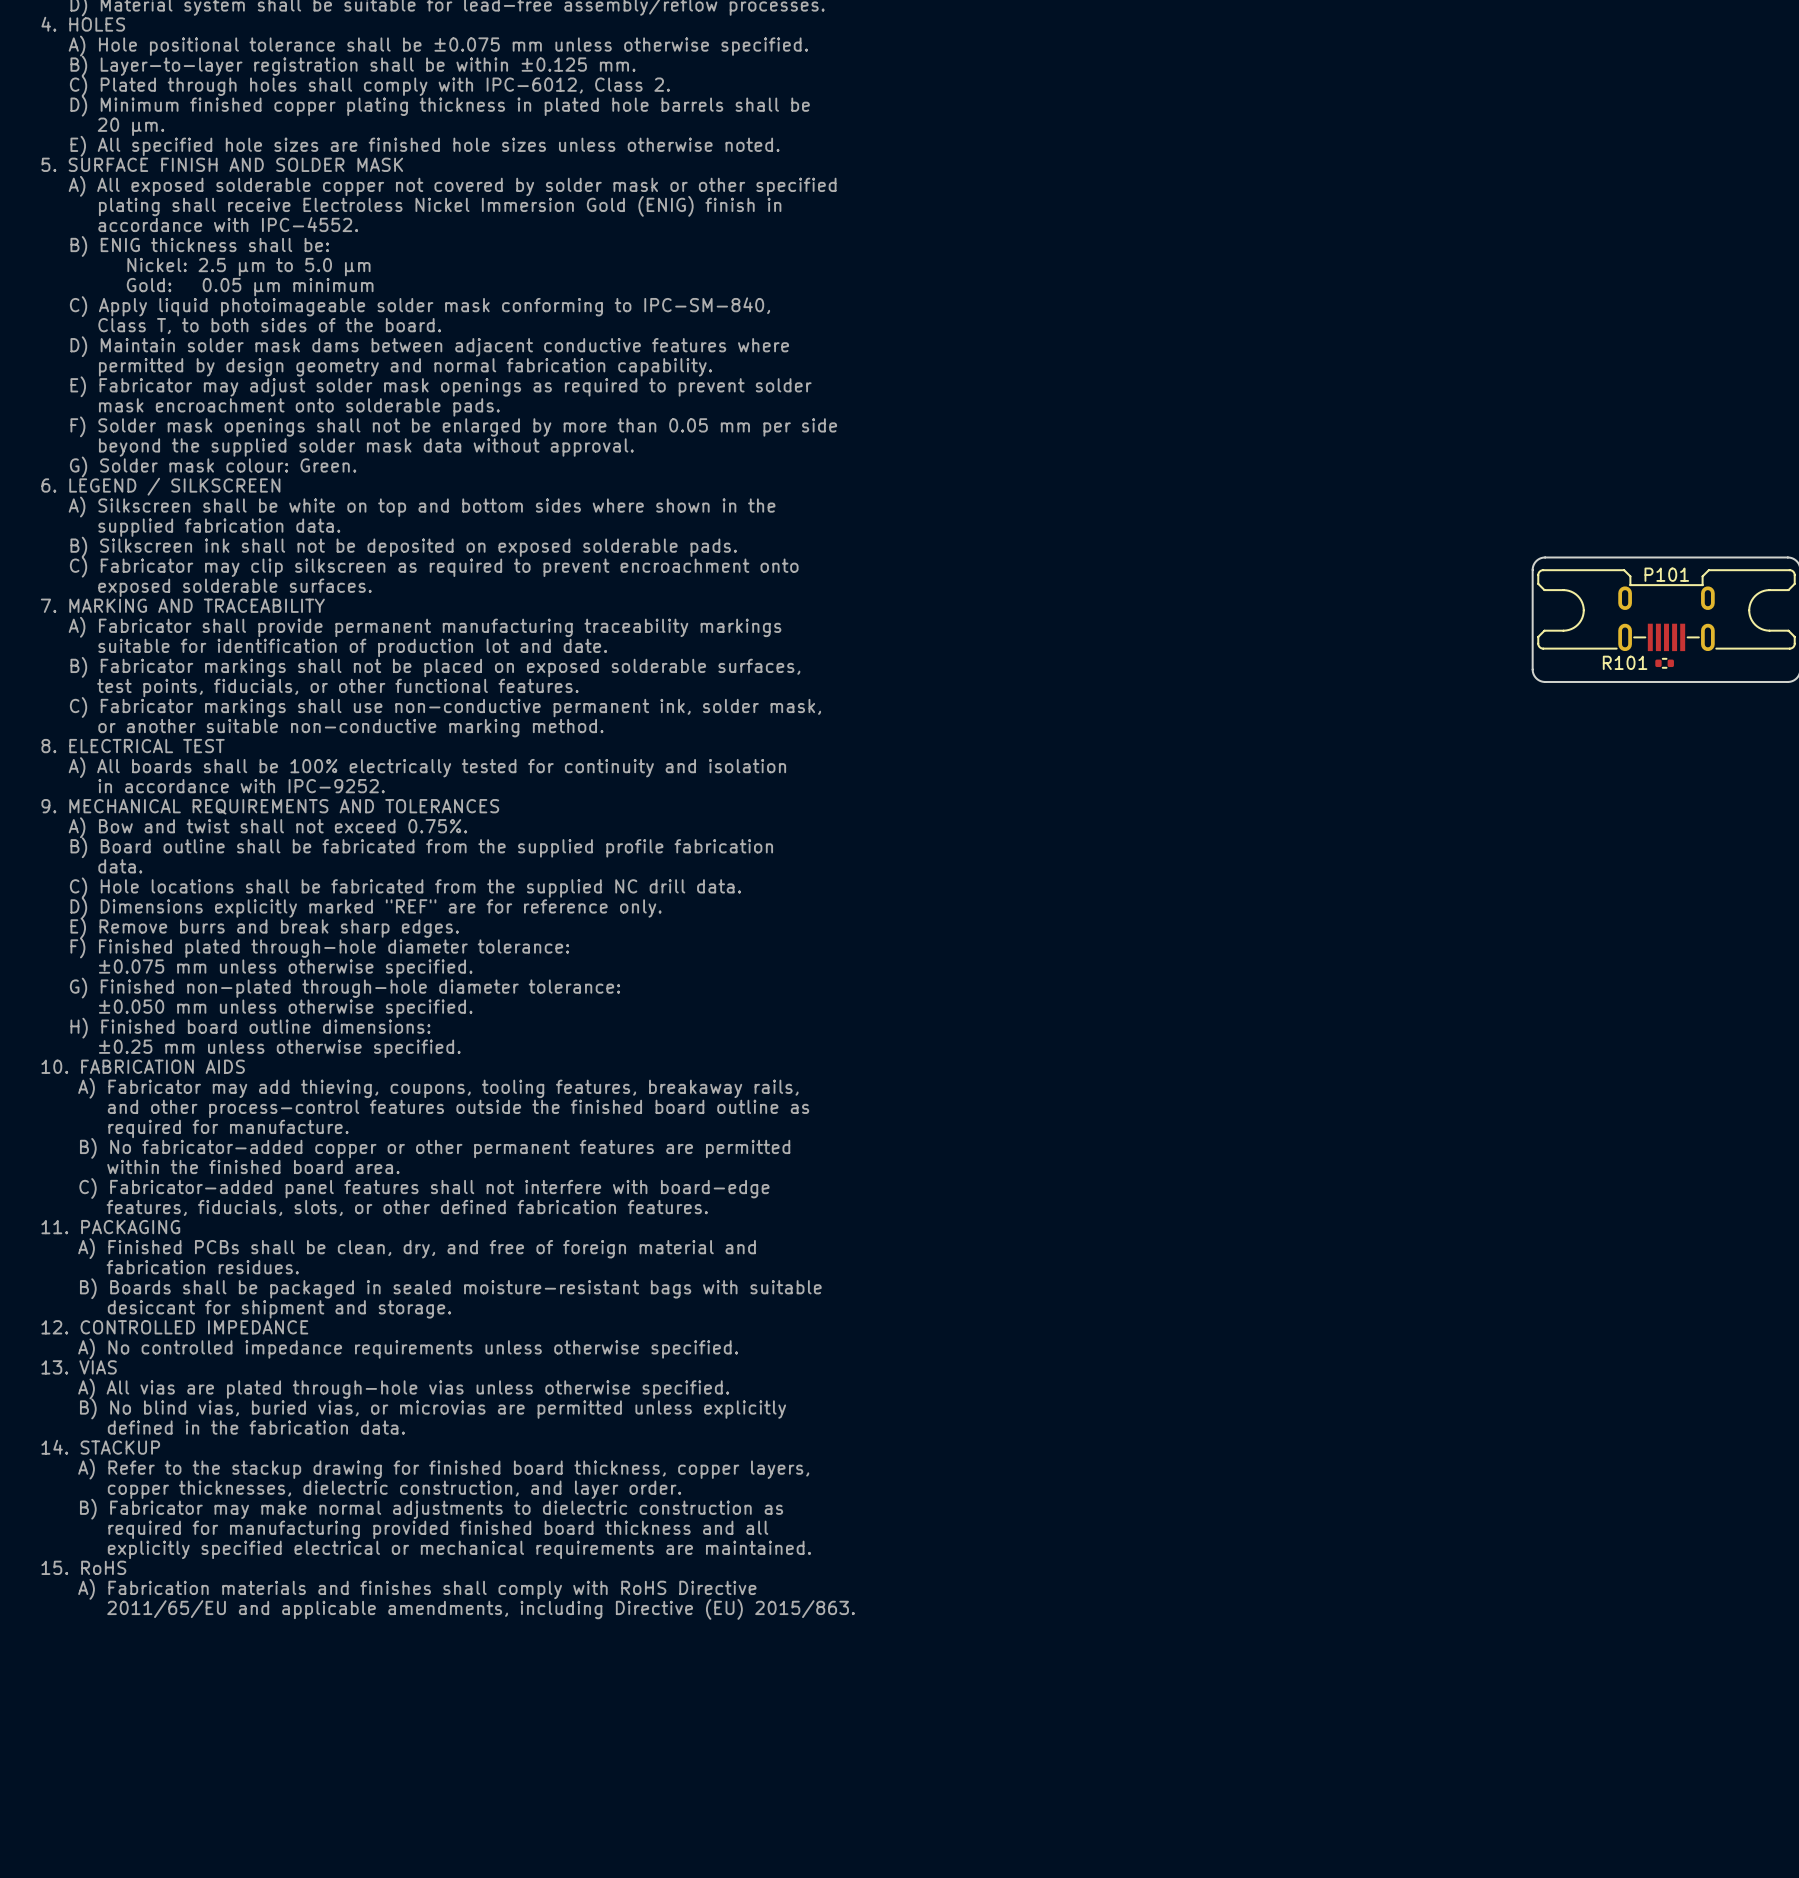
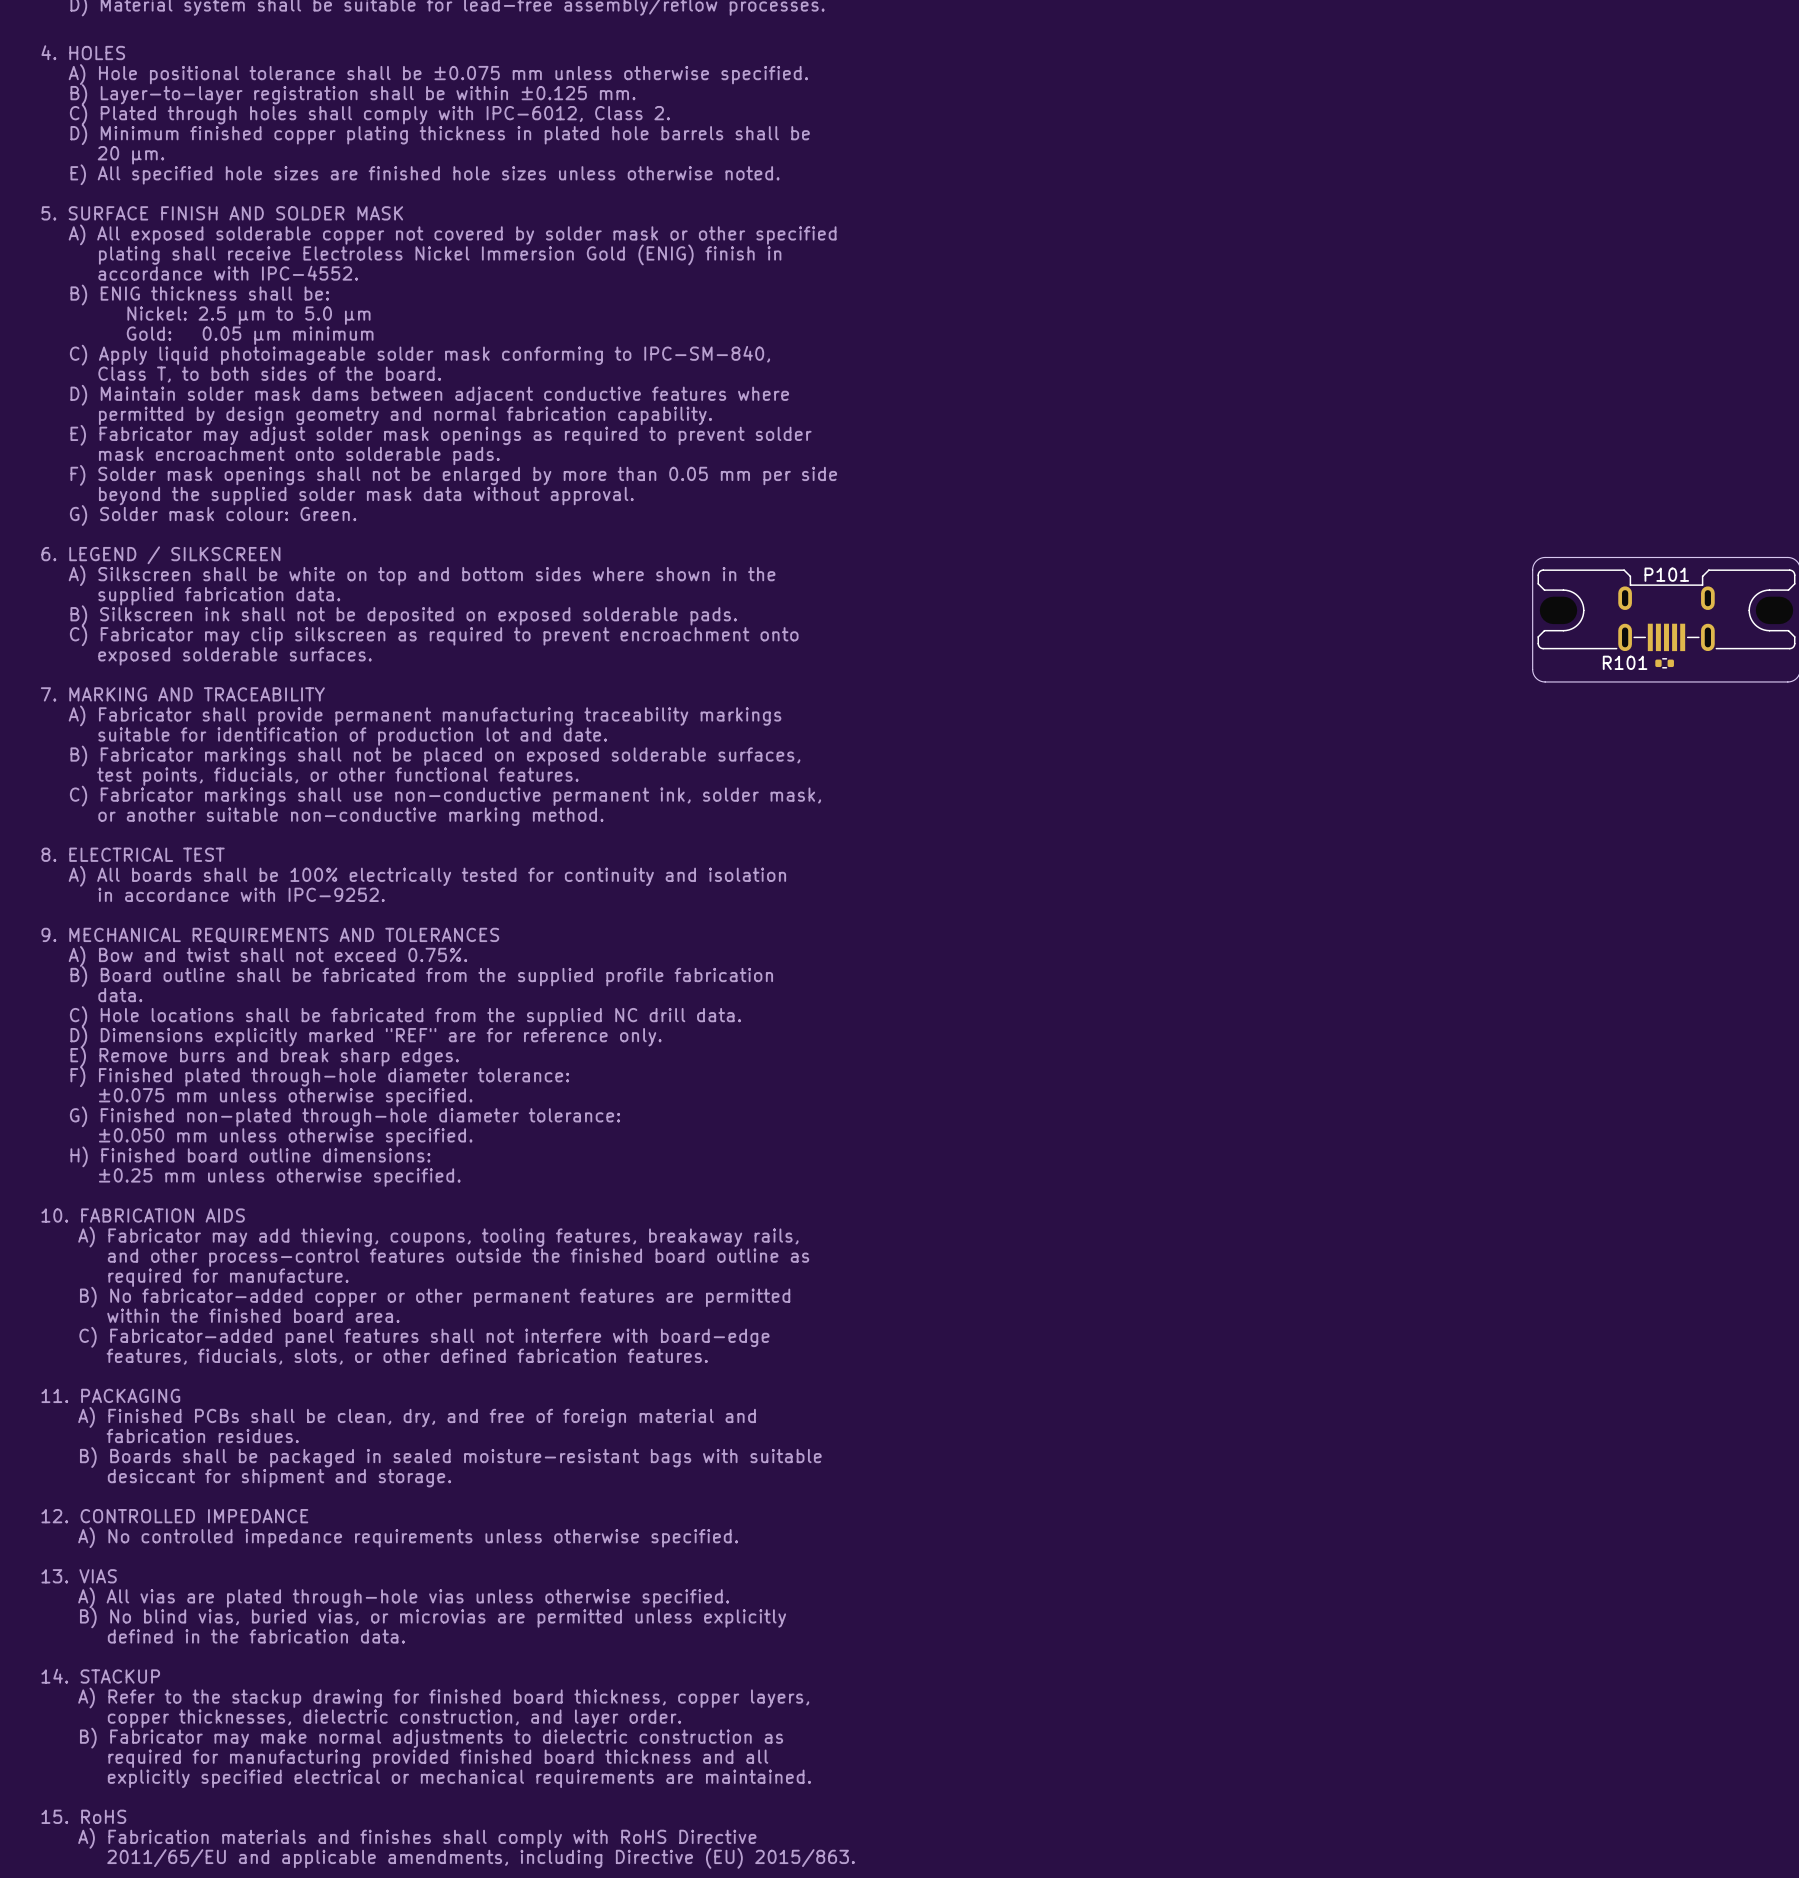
text position: 4. HOLES (83, 24) -> 4. HOLES (83, 52)
text position: A) Hole positional tolerance shall be ±0.075 mm unless otherwise specified. (438, 46) -> A) Hole positional tolerance shall be ±0.075 mm unless otherwise specified. (438, 74)
text position: B) Layer-to-layer registration shall be within ±0.125 mm. (352, 66) -> B) Layer-to-layer registration shall be within ±0.125 mm. (352, 94)
text position: C) Plated through holes shall comply with IPC-6012, Class 2. (369, 86) -> C) Plated through holes shall comply with IPC-6012, Class 2. (369, 114)
text position: D) Minimum finished copper plating thickness in plated hole barrels shall be (440, 106) -> D) Minimum finished copper plating thickness in plated hole barrels shall be (440, 134)
text position: 20 µm. (130, 126) -> 20 µm. (130, 155)
text position: E) All specified hole sizes are finished hole sizes unless otherwise noted. (425, 146) -> E) All specified hole sizes are finished hole sizes unless otherwise noted. (425, 174)
text position: 5. SURFACE FINISH AND SOLDER MASK (222, 164) -> 5. SURFACE FINISH AND SOLDER MASK (222, 213)
text position: A) All exposed solderable copper not covered by solder mask or other specified (452, 186) -> A) All exposed solderable copper not covered by solder mask or other specified (452, 234)
text position: plating shall receive Electroless Nickel Immersion Gold (ENIG) finish in (440, 206) -> plating shall receive Electroless Nickel Immersion Gold (ENIG) finish in (440, 254)
text position: accordance with IPC-4552. (228, 224) -> accordance with IPC-4552. (228, 273)
text position: B) ENIG thickness shall be: (199, 246) -> B) ENIG thickness shall be: (199, 295)
text position: Nickel: 2.5 µm to 5.0 µm (248, 267) -> Nickel: 2.5 µm to 5.0 µm (248, 315)
text position: Gold: 0.05 µm minimum (250, 287) -> Gold: 0.05 µm minimum (250, 335)
text position: C) Apply liquid photoimageable solder mask conforming to IPC-SM-840, (419, 306) -> C) Apply liquid photoimageable solder mask conforming to IPC-SM-840, (419, 355)
text position: Class T, to both sides of the board. (269, 326) -> Class T, to both sides of the board. (269, 374)
text position: D) Maintain solder mask dams between adjacent conductive features where (429, 346) -> D) Maintain solder mask dams between adjacent conductive features where (429, 395)
text position: permitted by design geometry and normal fabrication capability. (405, 367) -> permitted by design geometry and normal fabrication capability. (405, 415)
text position: E) Fabricator may adjust solder mask openings as required to prevent solder (441, 386) -> E) Fabricator may adjust solder mask openings as required to prevent solder (441, 435)
text position: mask encroachment onto solderable pads. (299, 407) -> mask encroachment onto solderable pads. (299, 455)
text position: F) Solder mask openings shall not be enlarged by more than 0.05 mm per side (453, 426) -> F) Solder mask openings shall not be enlarged by more than 0.05 mm per side (453, 475)
text position: beyond the supplied solder mask data without approval. (366, 447) -> beyond the supplied solder mask data without approval. (366, 496)
text position: G) Solder mask colour: Green. (213, 466) -> G) Solder mask colour: Green. (213, 515)
text position: 6. LEGEND / SILKSCREEN (160, 486) -> 6. LEGEND / SILKSCREEN (160, 555)
text position: A) Silkscreen shall be white on top and bottom sides where shown in the (422, 507) -> A) Silkscreen shall be white on top and bottom sides where shown in the (422, 575)
text position: supplied fabrication data. (219, 527) -> supplied fabrication data. (219, 596)
text position: B) Silkscreen ink shall not be deposited on exposed solderable pads. (403, 547) -> B) Silkscreen ink shall not be deposited on exposed solderable pads. (403, 615)
text position: C) Fabricator may clip silkscreen as required to prevent encroachment onto (434, 567) -> C) Fabricator may clip silkscreen as required to prevent encroachment onto (434, 635)
text position: exposed solderable surfaces. (235, 587) -> exposed solderable surfaces. (235, 656)
text position: 7. MARKING AND TRACEABILITY (182, 605) -> 7. MARKING AND TRACEABILITY (182, 694)
text position: A) Fabricator shall provide permanent manufacturing traceability markings (425, 627) -> A) Fabricator shall provide permanent manufacturing traceability markings (425, 715)
text position: suitable for identification of production lot and date. (352, 647) -> suitable for identification of production lot and date. (352, 736)
text position: B) Fabricator markings shall not be placed on exposed solderable surfaces, (435, 667) -> B) Fabricator markings shall not be placed on exposed solderable surfaces, (435, 756)
text position: test points, fiducials, or other functional features. (337, 688) -> test points, fiducials, or other functional features. (337, 776)
text position: C) Fabricator markings shall use non-conductive permanent ink, solder mask, (445, 707) -> C) Fabricator markings shall use non-conductive permanent ink, solder mask, (445, 796)
text position: or another suitable non-conductive marking method. (350, 728) -> or another suitable non-conductive marking method. (350, 816)
text position: 8. ELECTRICAL TEST (133, 746) -> 8. ELECTRICAL TEST (133, 854)
text position: A) All boards shall be 100% electrically tested for continuity and isolation (427, 767) -> A) All boards shall be 100% electrically tested for continuity and isolation (427, 876)
text position: in accordance with IPC-9252. (241, 786) -> in accordance with IPC-9252. (241, 894)
text position: 9. MECHANICAL REQUIREMENTS AND TOLERANCES (270, 806) -> 9. MECHANICAL REQUIREMENTS AND TOLERANCES (270, 935)
text position: A) Bow and twist shall not exceed 0.75%. (267, 827) -> A) Bow and twist shall not exceed 0.75%. (267, 956)
text position: B) Board outline shall be fabricated from the supplied profile fabrication (421, 847) -> B) Board outline shall be fabricated from the supplied profile fabrication (421, 976)
text position: data. (120, 866) -> data. (120, 995)
text position: C) Hole locations shall be fabricated from the supplied NC drill data. (405, 887) -> C) Hole locations shall be fabricated from the supplied NC drill data. (405, 1016)
text position: D) Dimensions explicitly marked "REF" are for reference only. (366, 907) -> D) Dimensions explicitly marked "REF" are for reference only. (366, 1036)
text position: E) Remove burrs and break sharp edges. (264, 927) -> E) Remove burrs and break sharp edges. (264, 1056)
text position: F) Finished plated through-hole diameter tolerance: (319, 947) -> F) Finished plated through-hole diameter tolerance: (319, 1076)
text position: ±0.075 mm unless otherwise specified. (285, 968) -> ±0.075 mm unless otherwise specified. (285, 1097)
text position: G) Finished non-plated through-hole diameter tolerance: (344, 988) -> G) Finished non-plated through-hole diameter tolerance: (344, 1116)
text position: ±0.050 mm unless otherwise specified. (285, 1008) -> ±0.050 mm unless otherwise specified. (285, 1137)
text position: H) Finished board outline dimensions: (250, 1028) -> H) Finished board outline dimensions: (250, 1156)
text position: ±0.25 mm unless otherwise specified. (279, 1048) -> ±0.25 mm unless otherwise specified. (279, 1177)
text position: 10. FABRICATION AIDS (143, 1066) -> 10. FABRICATION AIDS (143, 1215)
text position: A) Fabricator may add thieving, coupons, tooling features, breakaway rails, (438, 1088) -> A) Fabricator may add thieving, coupons, tooling features, breakaway rails, (438, 1237)
text position: and other process-control features outside the finished board outline as (458, 1108) -> and other process-control features outside the finished board outline as (458, 1257)
text position: required for manufacture. (228, 1128) -> required for manufacture. (228, 1277)
text position: B) No fabricator-added copper or other permanent features are permitted (435, 1148) -> B) No fabricator-added copper or other permanent features are permitted (435, 1297)
text position: within the finished board area. (253, 1166) -> within the finished board area. (253, 1315)
text position: C) Fabricator-added panel features shall not interfere with board-edge (424, 1188) -> C) Fabricator-added panel features shall not interfere with board-edge (424, 1337)
text position: features, fiducials, slots, or other defined fabrication features. (407, 1207) -> features, fiducials, slots, or other defined fabrication features. (407, 1356)
text position: 11. PACKAGING (110, 1227) -> 11. PACKAGING (110, 1395)
text position: A) Finished PCBs shall be clean, dry, and free of foreign material and (417, 1248) -> A) Finished PCBs shall be clean, dry, and free of foreign material and (417, 1417)
text position: fabrication residues. (202, 1267) -> fabrication residues. (202, 1435)
text position: B) Boards shall be packaged in sealed moisture-resistant bags with suitable (450, 1288) -> B) Boards shall be packaged in sealed moisture-resistant bags with suitable (450, 1457)
text position: desiccant for shipment and storage. (279, 1309) -> desiccant for shipment and storage. (279, 1478)
text position: 12. CONTROLLED IMPEDANCE (174, 1327) -> 12. CONTROLLED IMPEDANCE (174, 1516)
text position: A) No controlled impedance requirements unless otherwise specified. (408, 1348) -> A) No controlled impedance requirements unless otherwise specified. (408, 1537)
text position: 13. VIAS (79, 1367) -> 13. VIAS (79, 1576)
text position: A) All vias are plated through-hole vias unless otherwise specified. (403, 1388) -> A) All vias are plated through-hole vias unless otherwise specified. (403, 1597)
text position: B) No blind vias, buried vias, or microvias are permitted unless explicitly (433, 1408) -> B) No blind vias, buried vias, or microvias are permitted unless explicitly (433, 1617)
text position: defined in the fabrication data. (256, 1427) -> defined in the fabrication data. (256, 1636)
text position: 14. STACKUP (100, 1447) -> 14. STACKUP (100, 1676)
text position: A) Refer to the stackup drawing for finished board thickness, copper layers, (443, 1469) -> A) Refer to the stackup drawing for finished board thickness, copper layers, (443, 1698)
text position: copper thicknesses, dielectric construction, and layer order. (394, 1489) -> copper thicknesses, dielectric construction, and layer order. (394, 1718)
text position: B) Fabricator may make normal adjustments to dielectric construction as (431, 1509) -> B) Fabricator may make normal adjustments to dielectric construction as (431, 1738)
text position: required for manufacturing provided finished board thickness and all (438, 1529) -> required for manufacturing provided finished board thickness and all (438, 1758)
text position: explicitly specified electrical or mechanical requirements are maintained. (459, 1549) -> explicitly specified electrical or mechanical requirements are maintained. (459, 1778)
text position: 15. RoHS (83, 1567) -> 15. RoHS (83, 1816)
text position: A) Fabrication materials and finishes shall comply with RoHS Directive (417, 1589) -> A) Fabrication materials and finishes shall comply with RoHS Directive (417, 1838)
text position: 2011/65/EU and applicable amendments, including Directive (EU) 2015/863. (481, 1609) -> 2011/65/EU and applicable amendments, including Directive (EU) 2015/863. (481, 1858)

